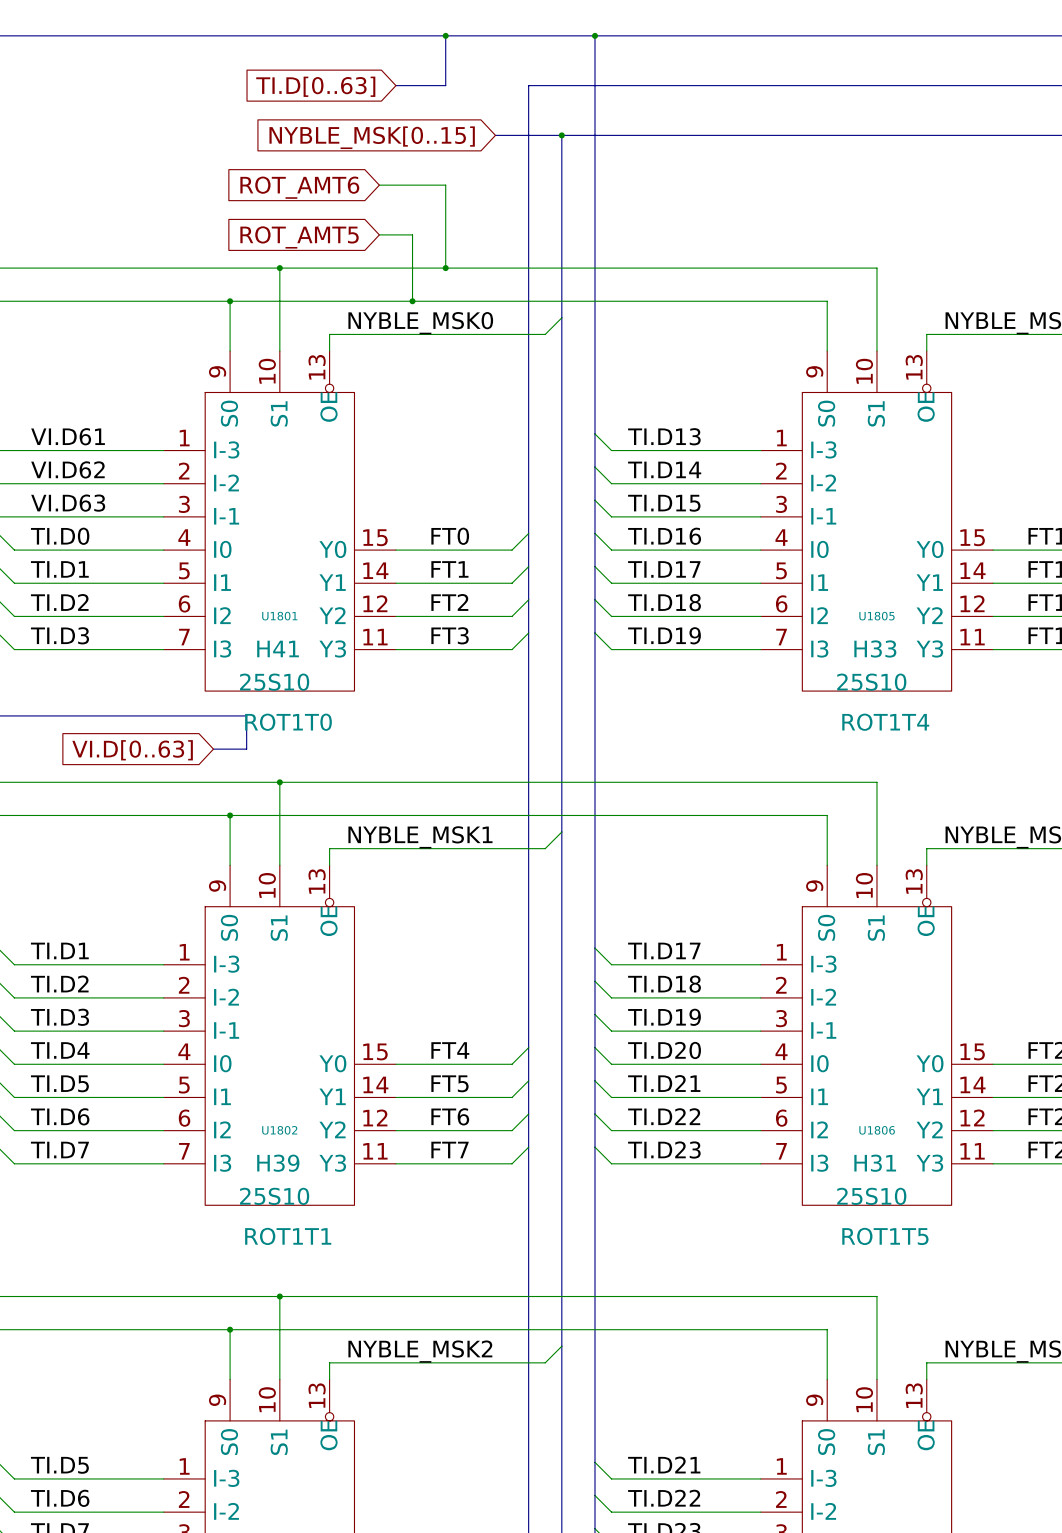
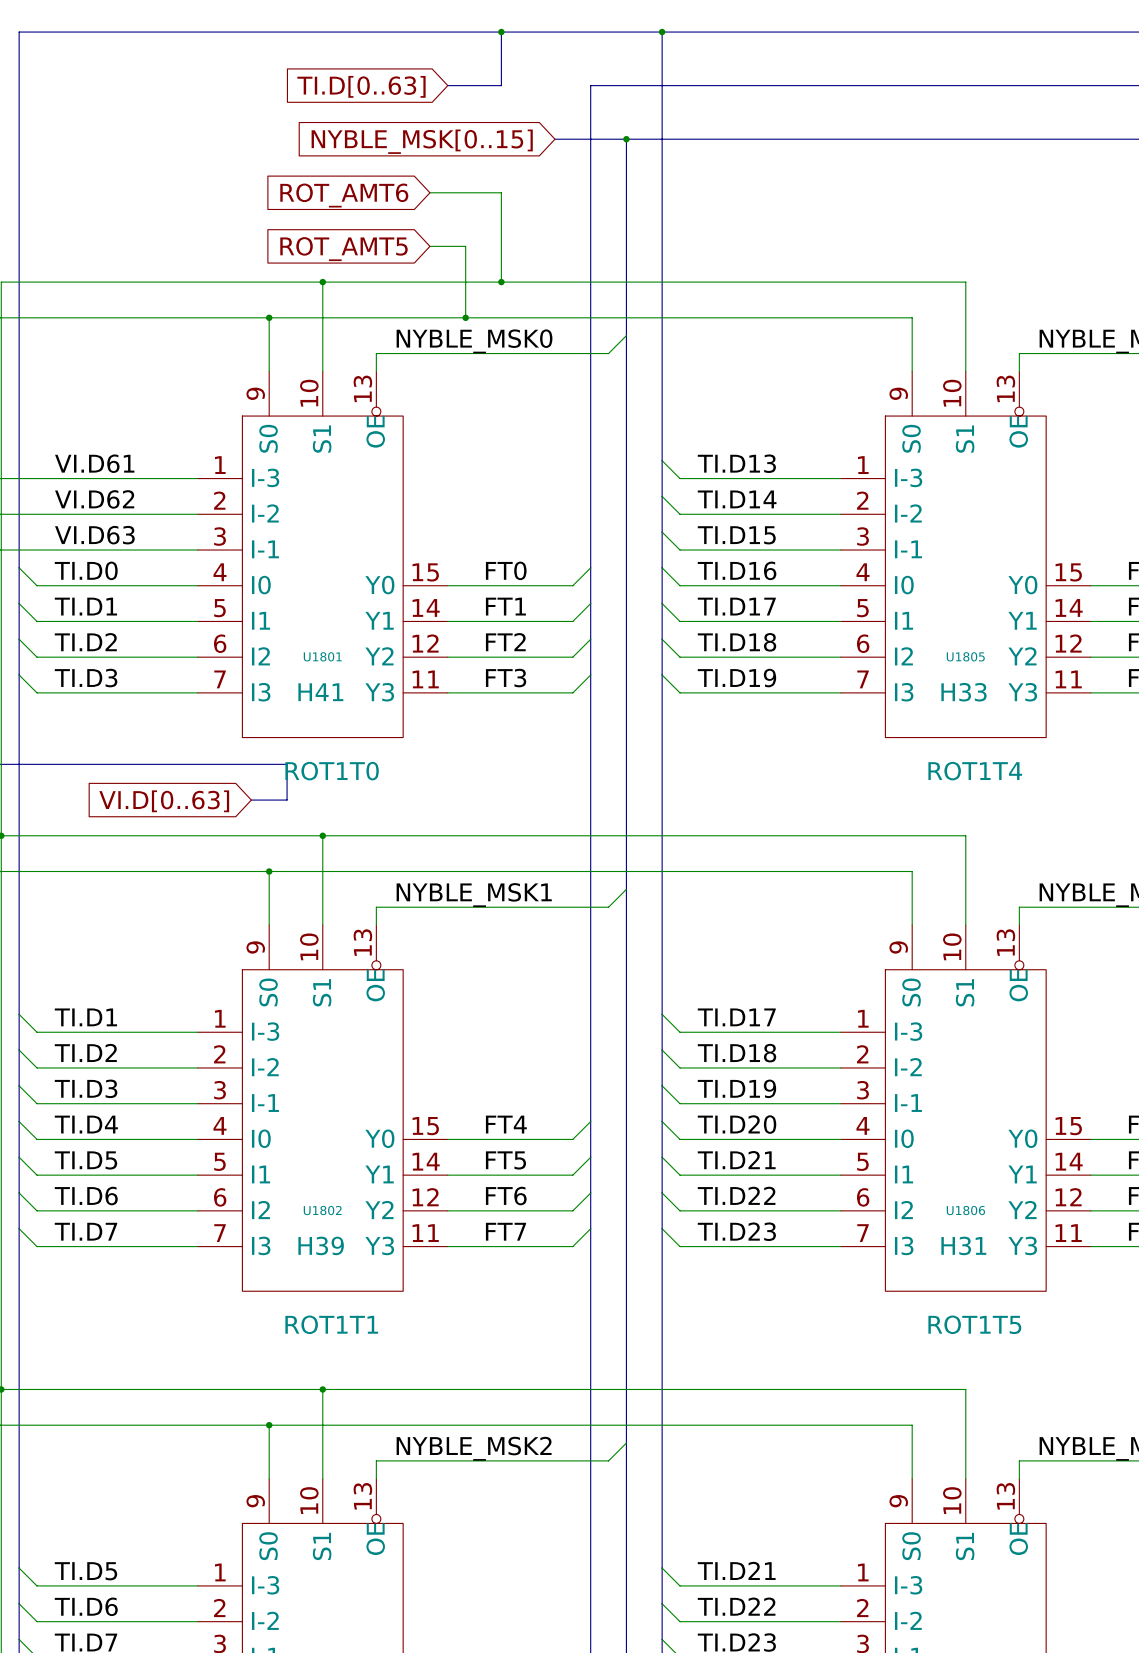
U1801 value: 25S10 (274, 682) -> none
U1805 value: 25S10 (871, 682) -> none
U1802 value: 25S10 (274, 1196) -> none
U1806 value: 25S10 (871, 1196) -> none

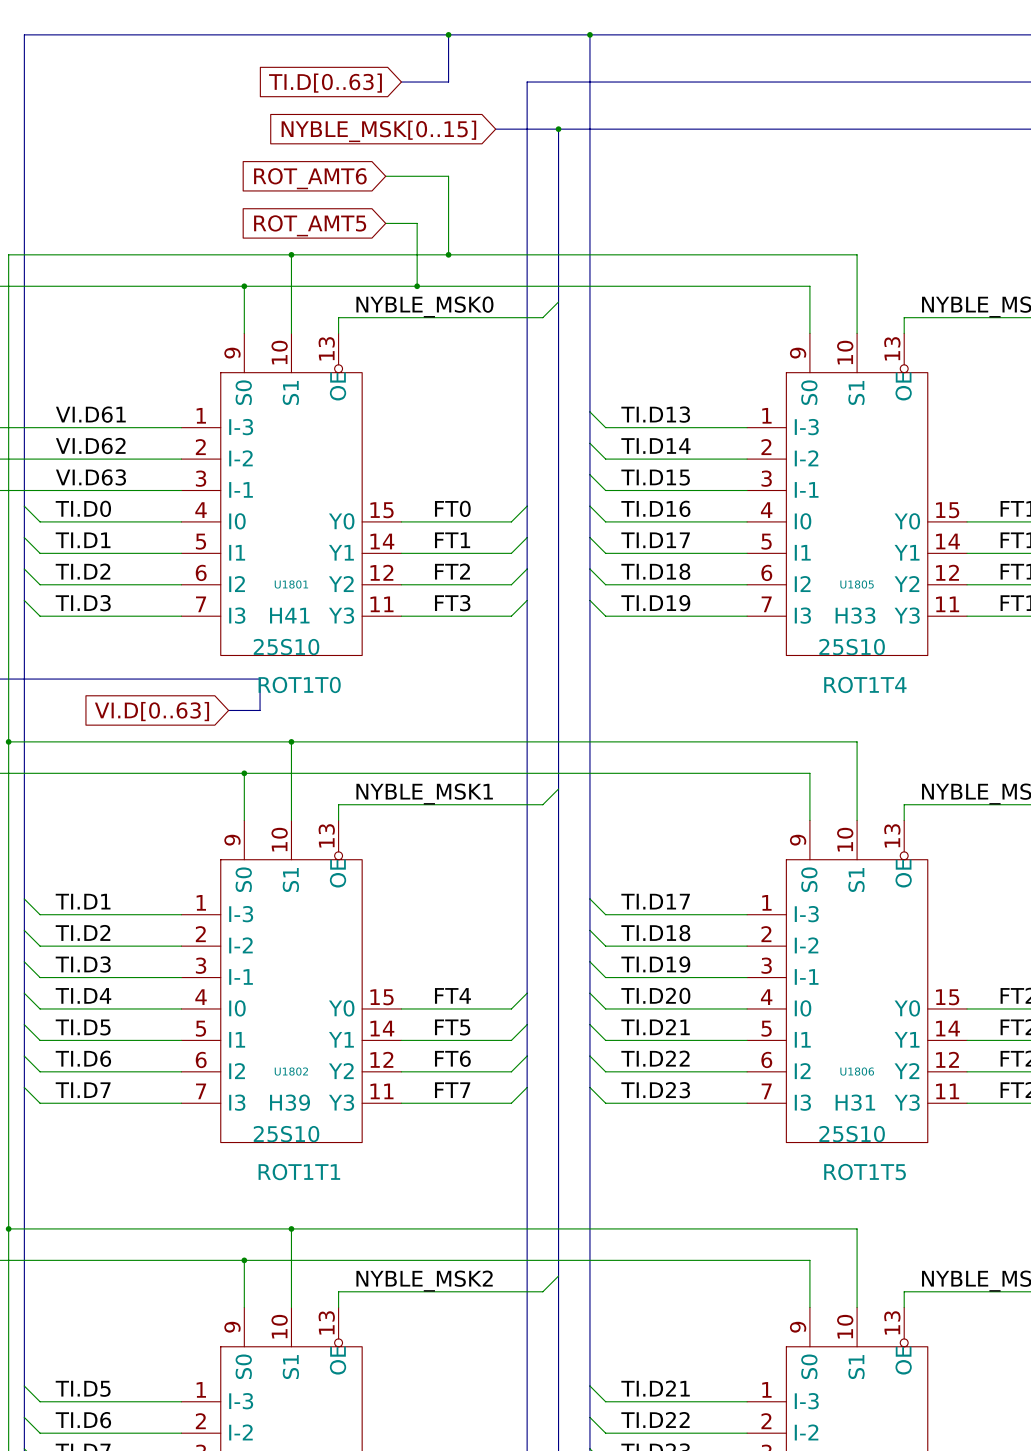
U1801 value: none -> 25S10 (286, 647)
U1805 value: none -> 25S10 (852, 647)
U1802 value: none -> 25S10 (286, 1134)
U1806 value: none -> 25S10 (852, 1134)

